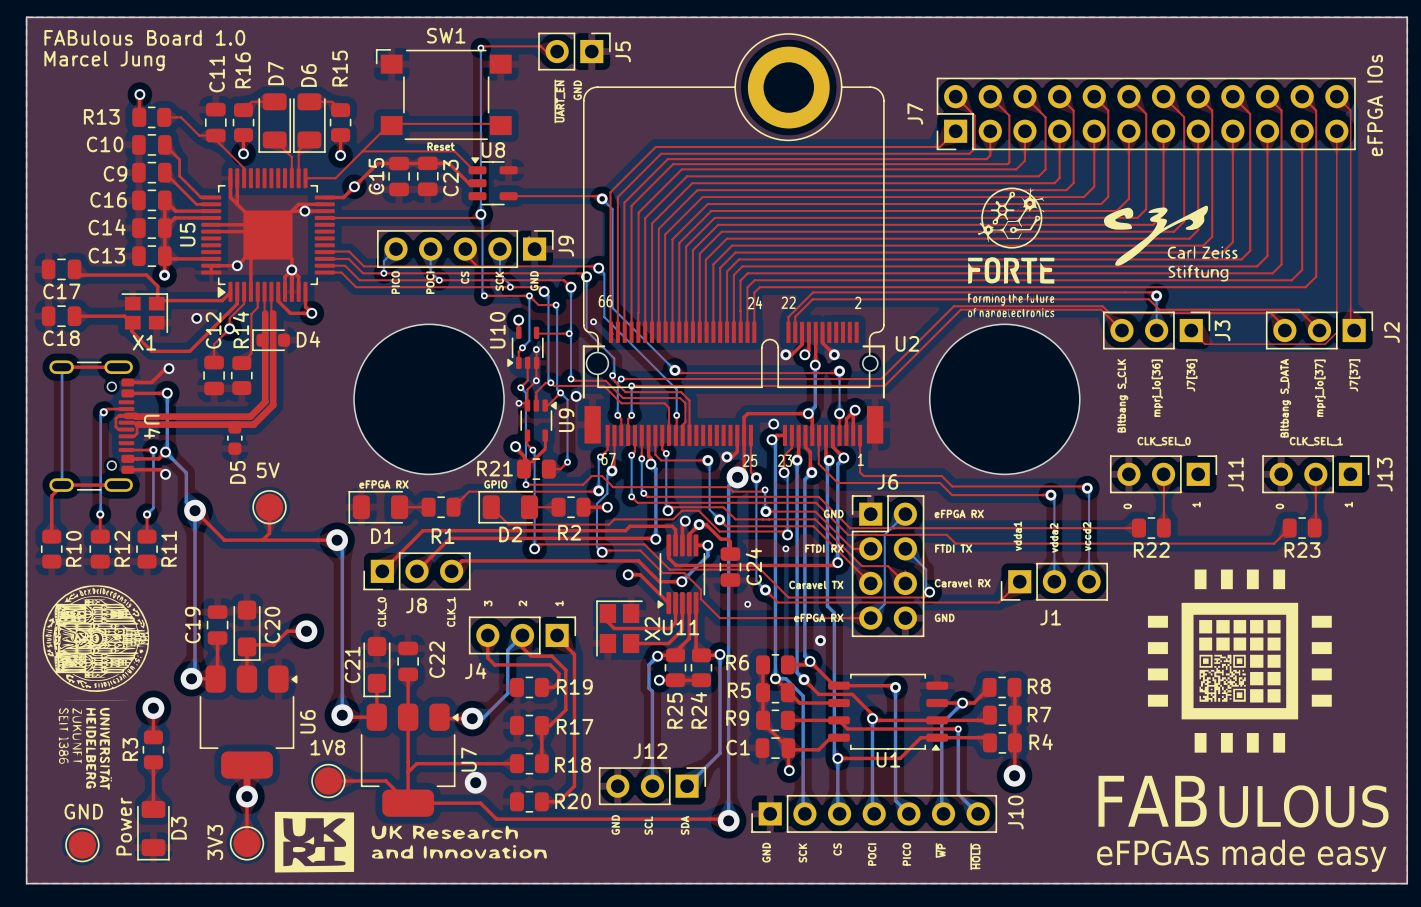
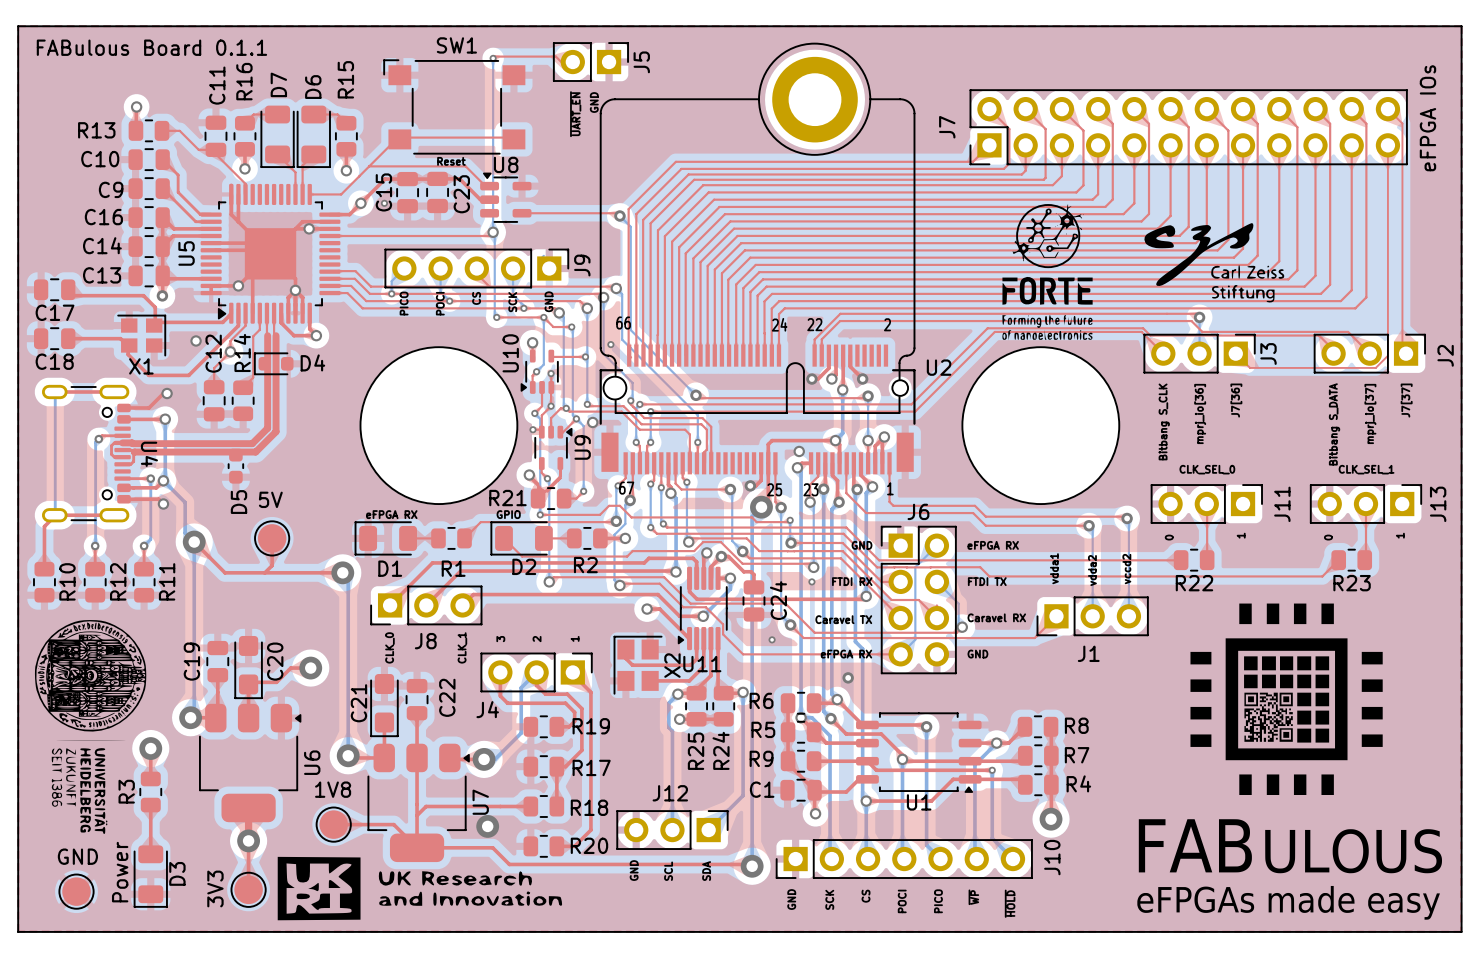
text: FABulous Board 1.0 (144, 37) -> FABulous Board 0.1.1 (151, 47)
text: Marcel Jung (104, 60) -> none

